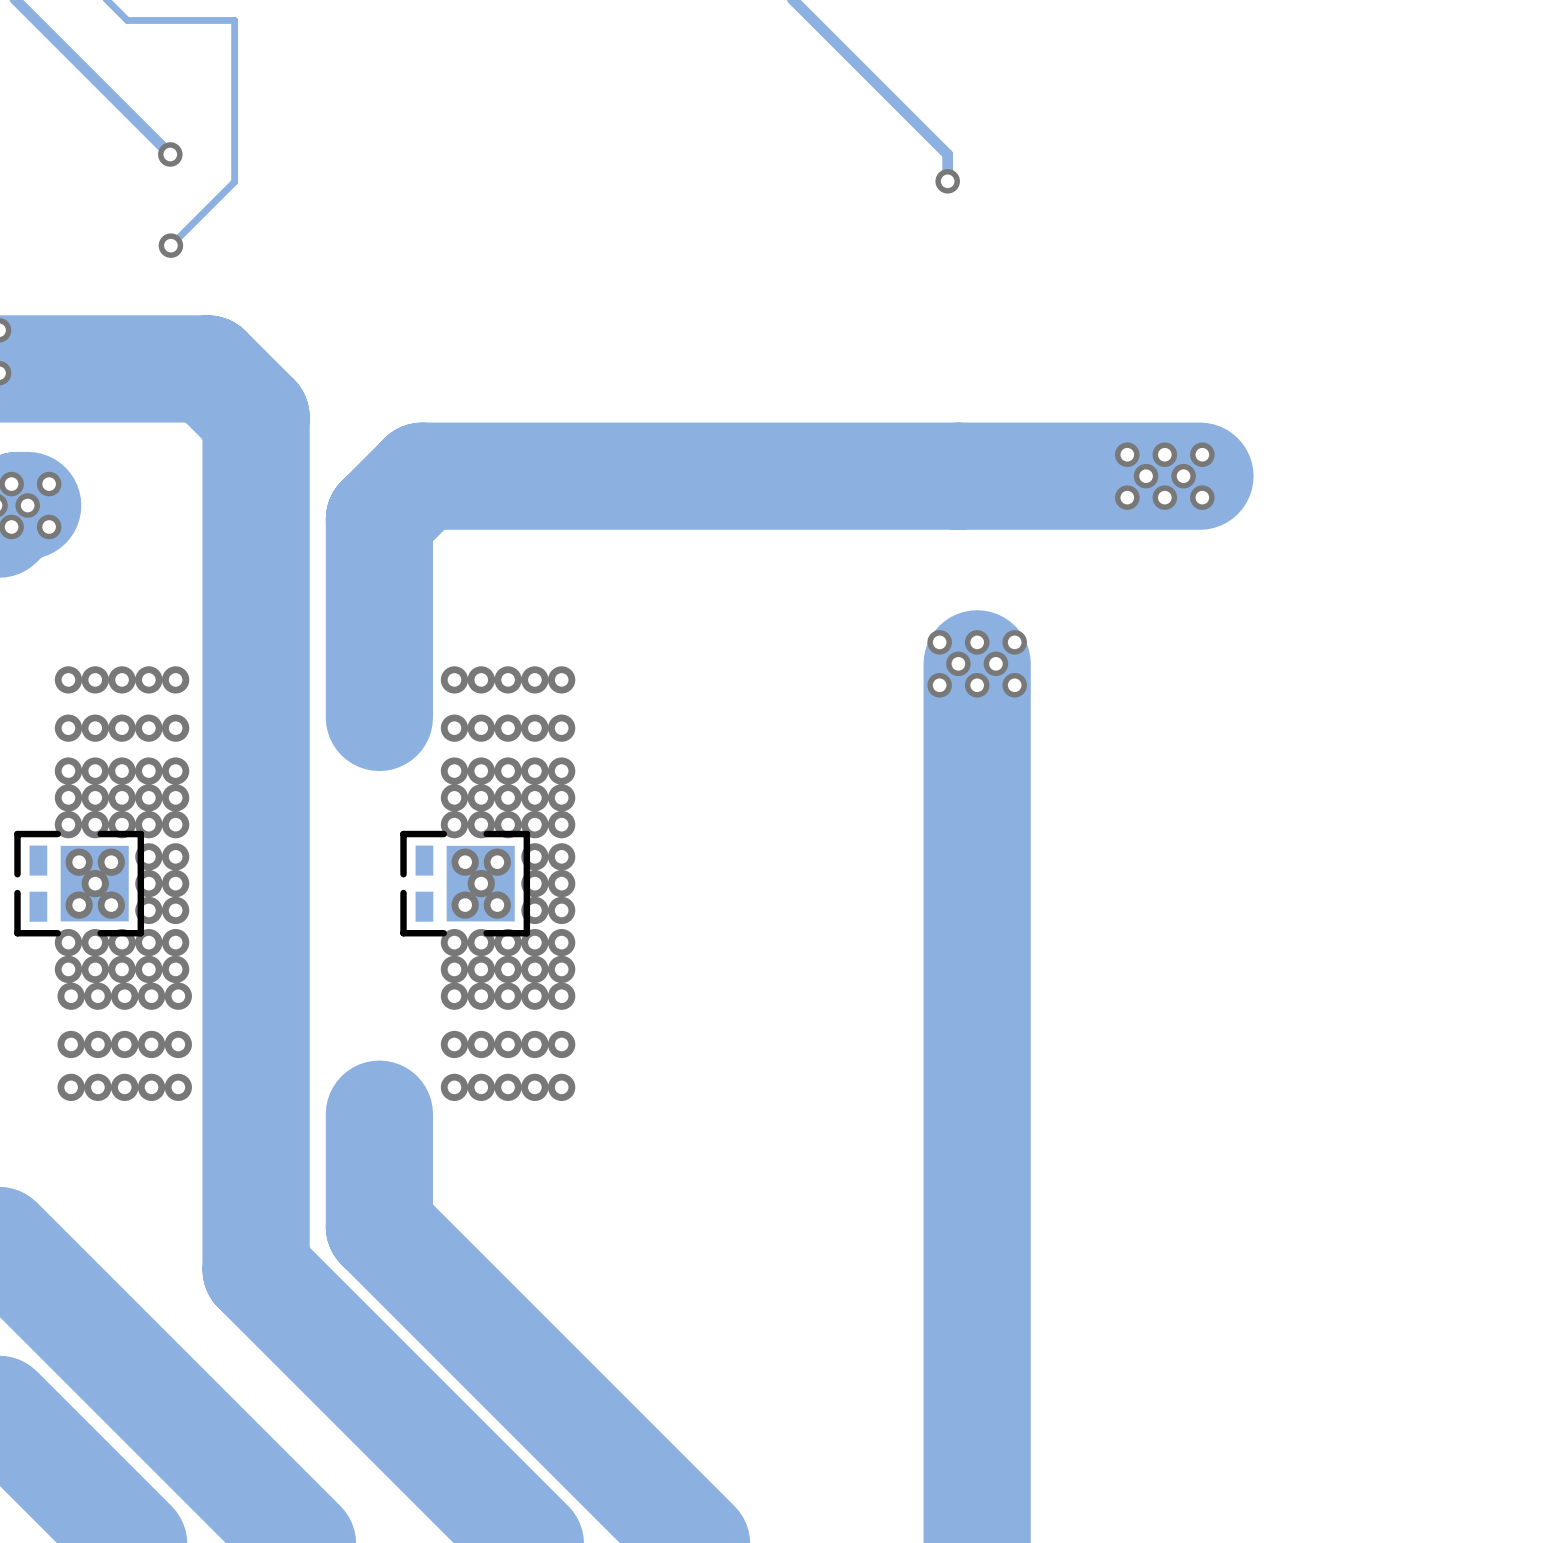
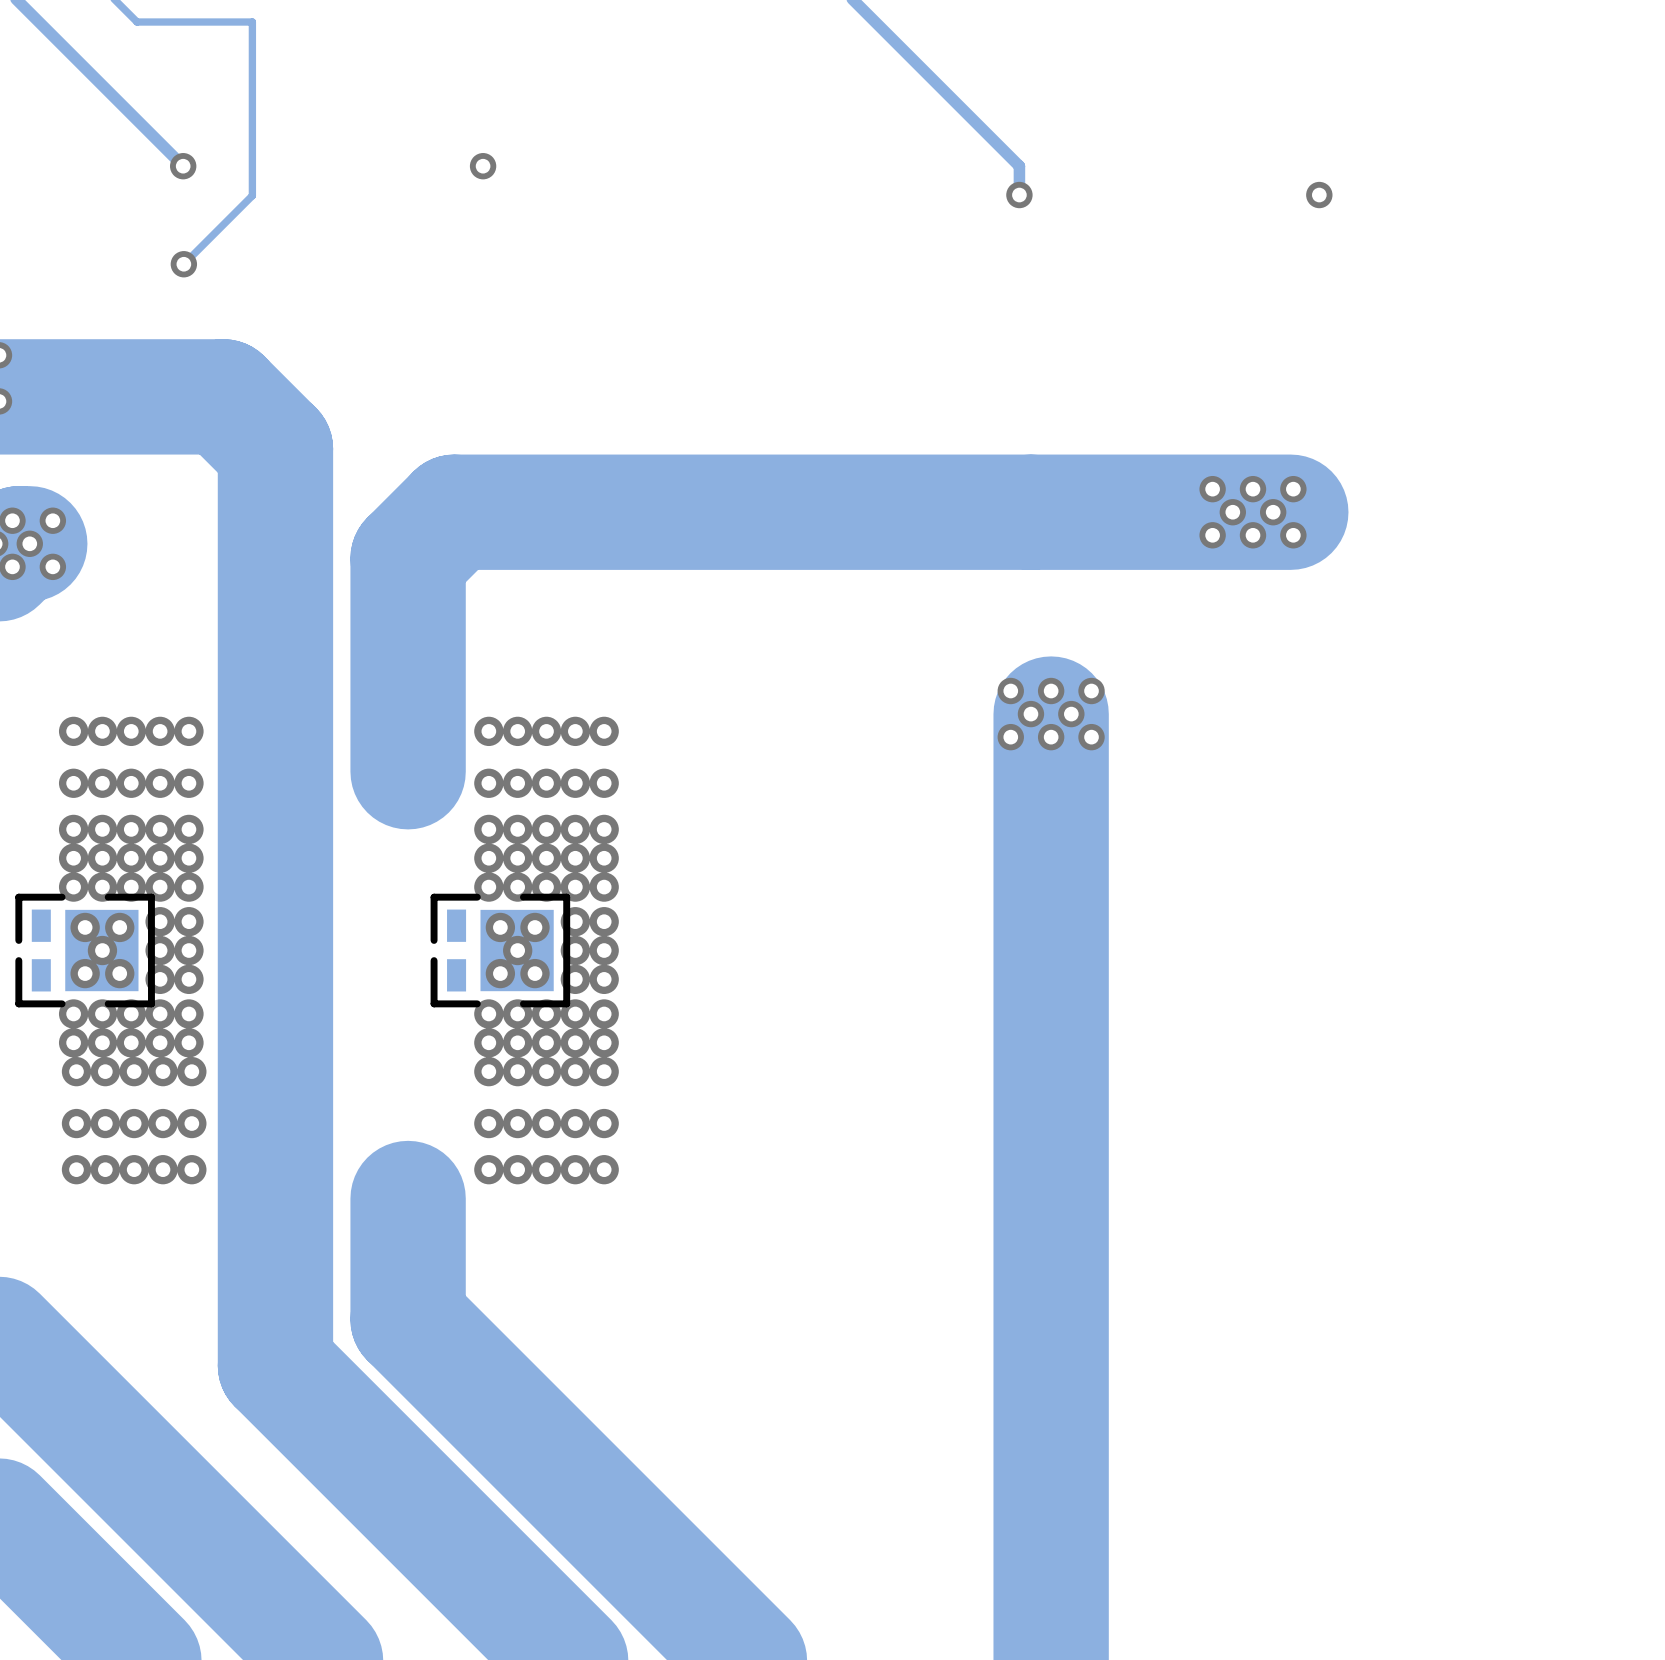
via: none -> (483, 166)
via: none -> (1319, 195)

